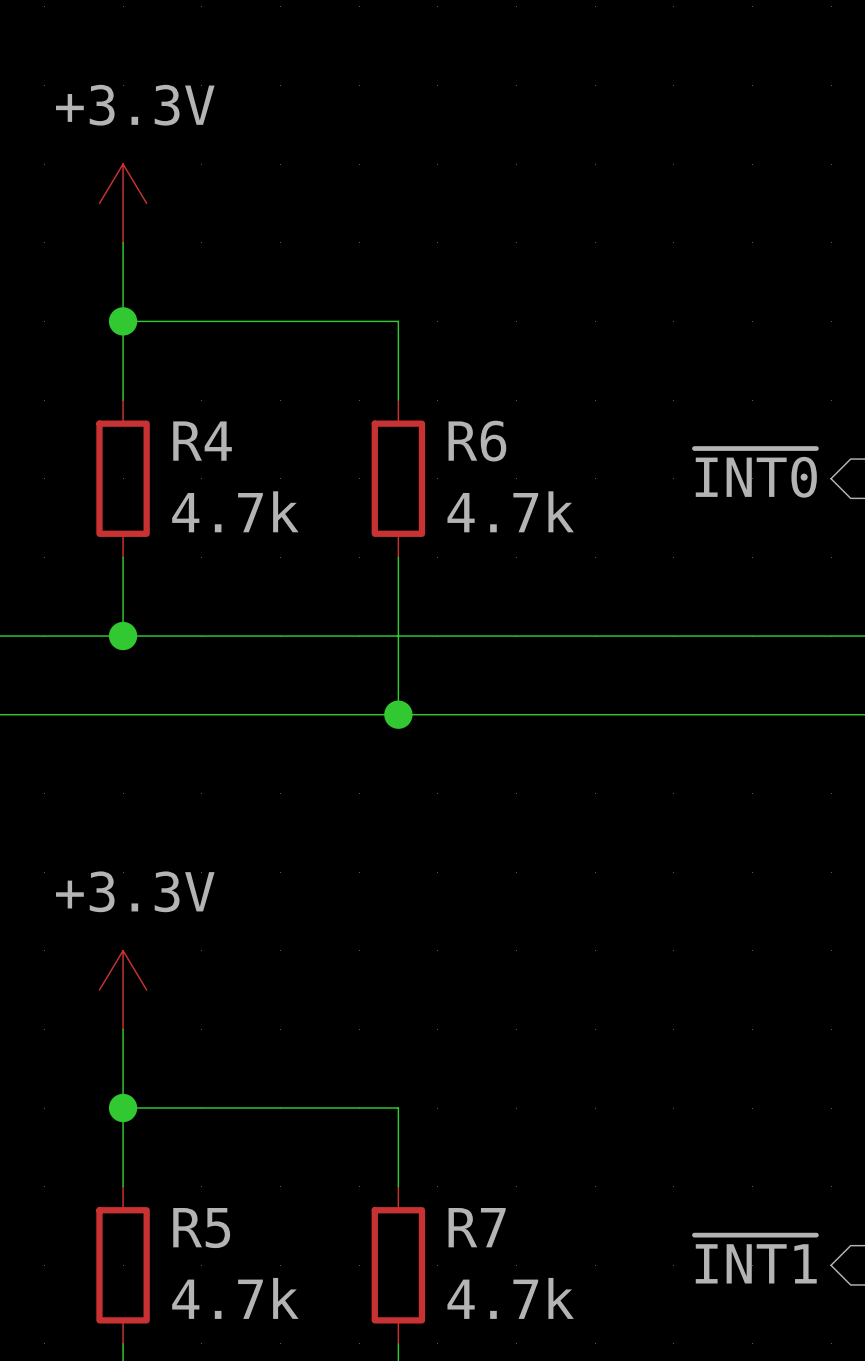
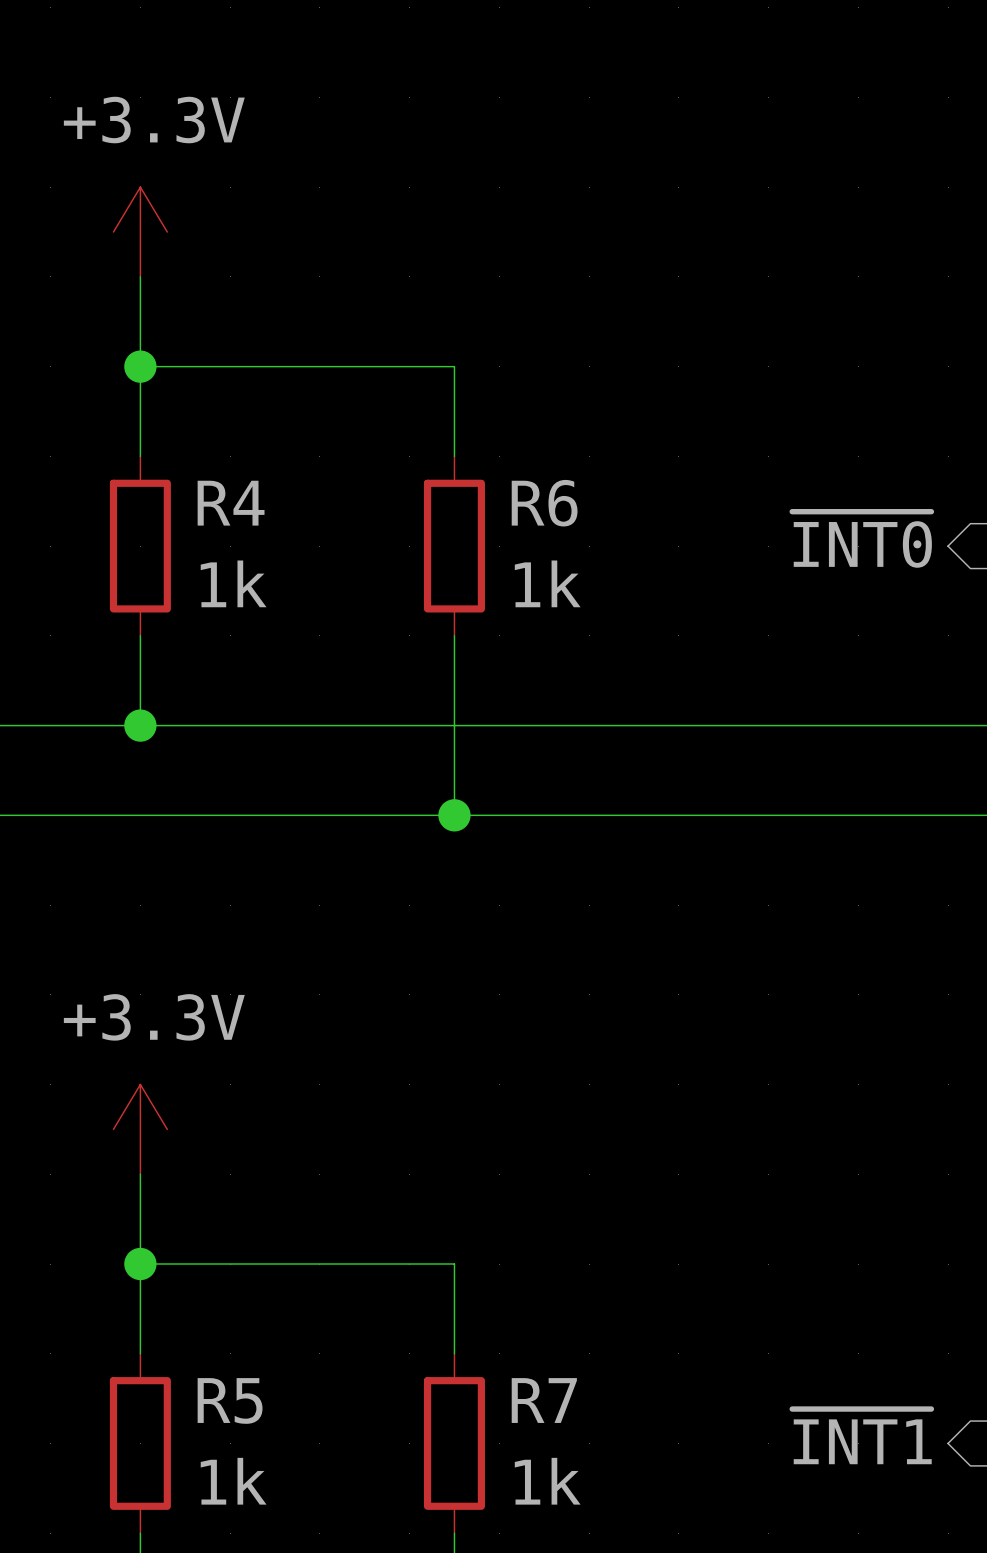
R4 value: 4.7k (235, 511) -> 1k (233, 583)
R6 value: 4.7k (510, 511) -> 1k (547, 583)
R5 value: 4.7k (235, 1298) -> 1k (233, 1481)
R7 value: 4.7k (510, 1298) -> 1k (547, 1481)

